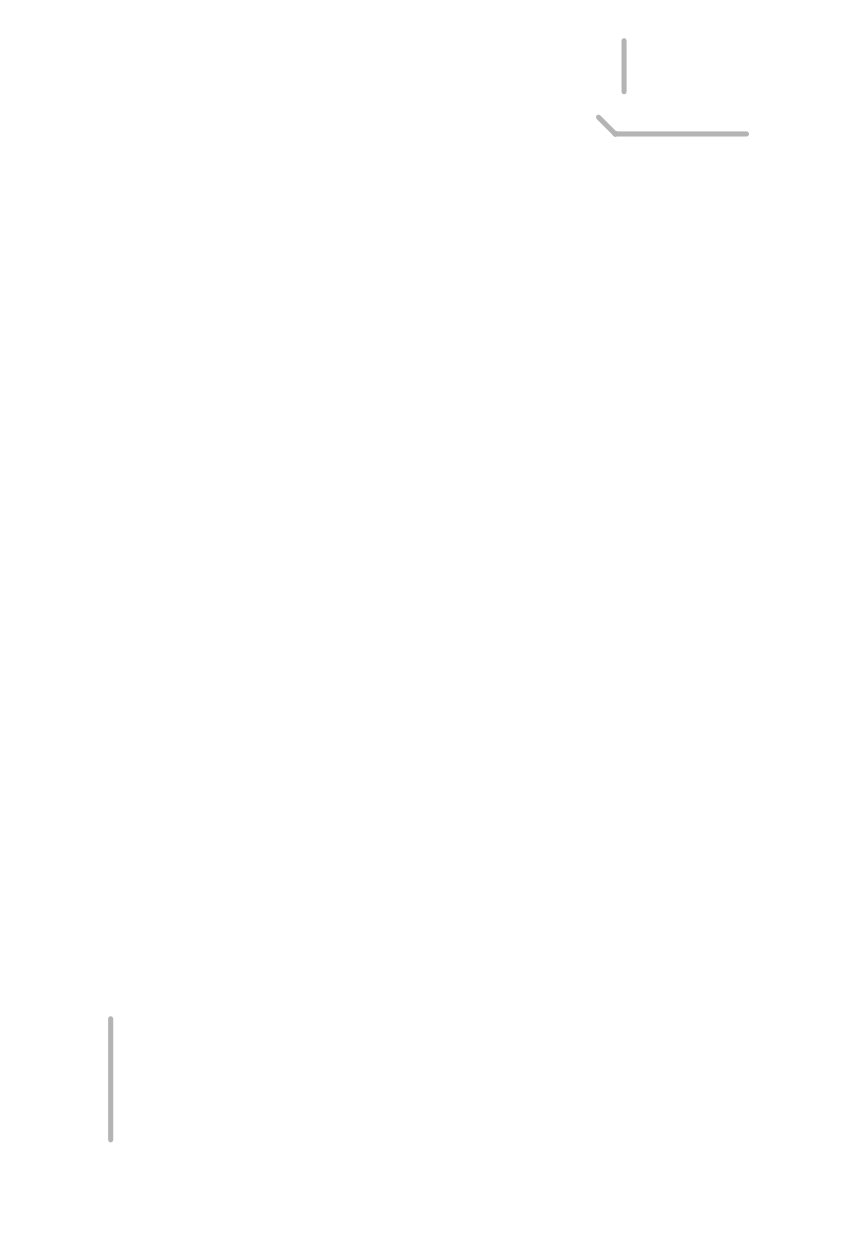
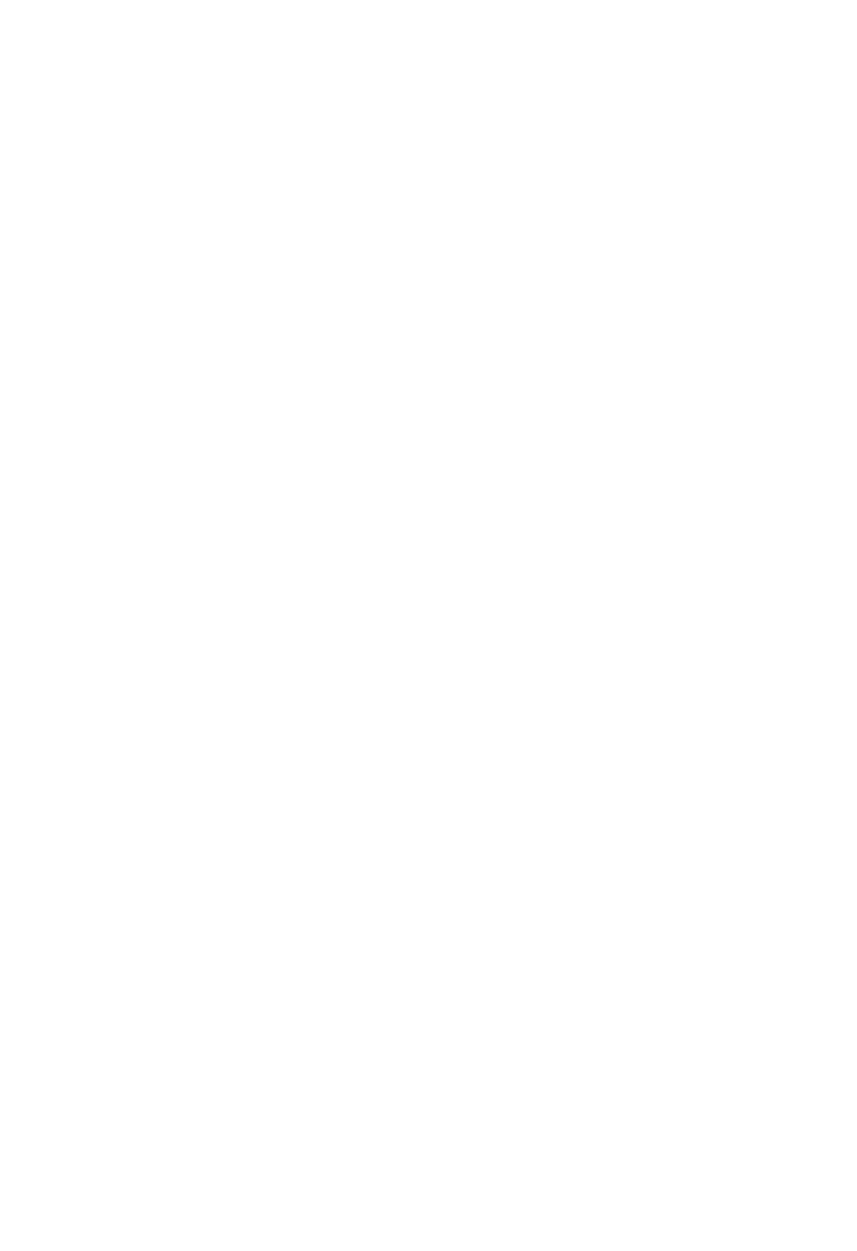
track: (624, 40) (624, 91) -> none
track: (598, 117) (615, 133) (746, 133) -> none
track: (110, 1018) (110, 1139) -> none

